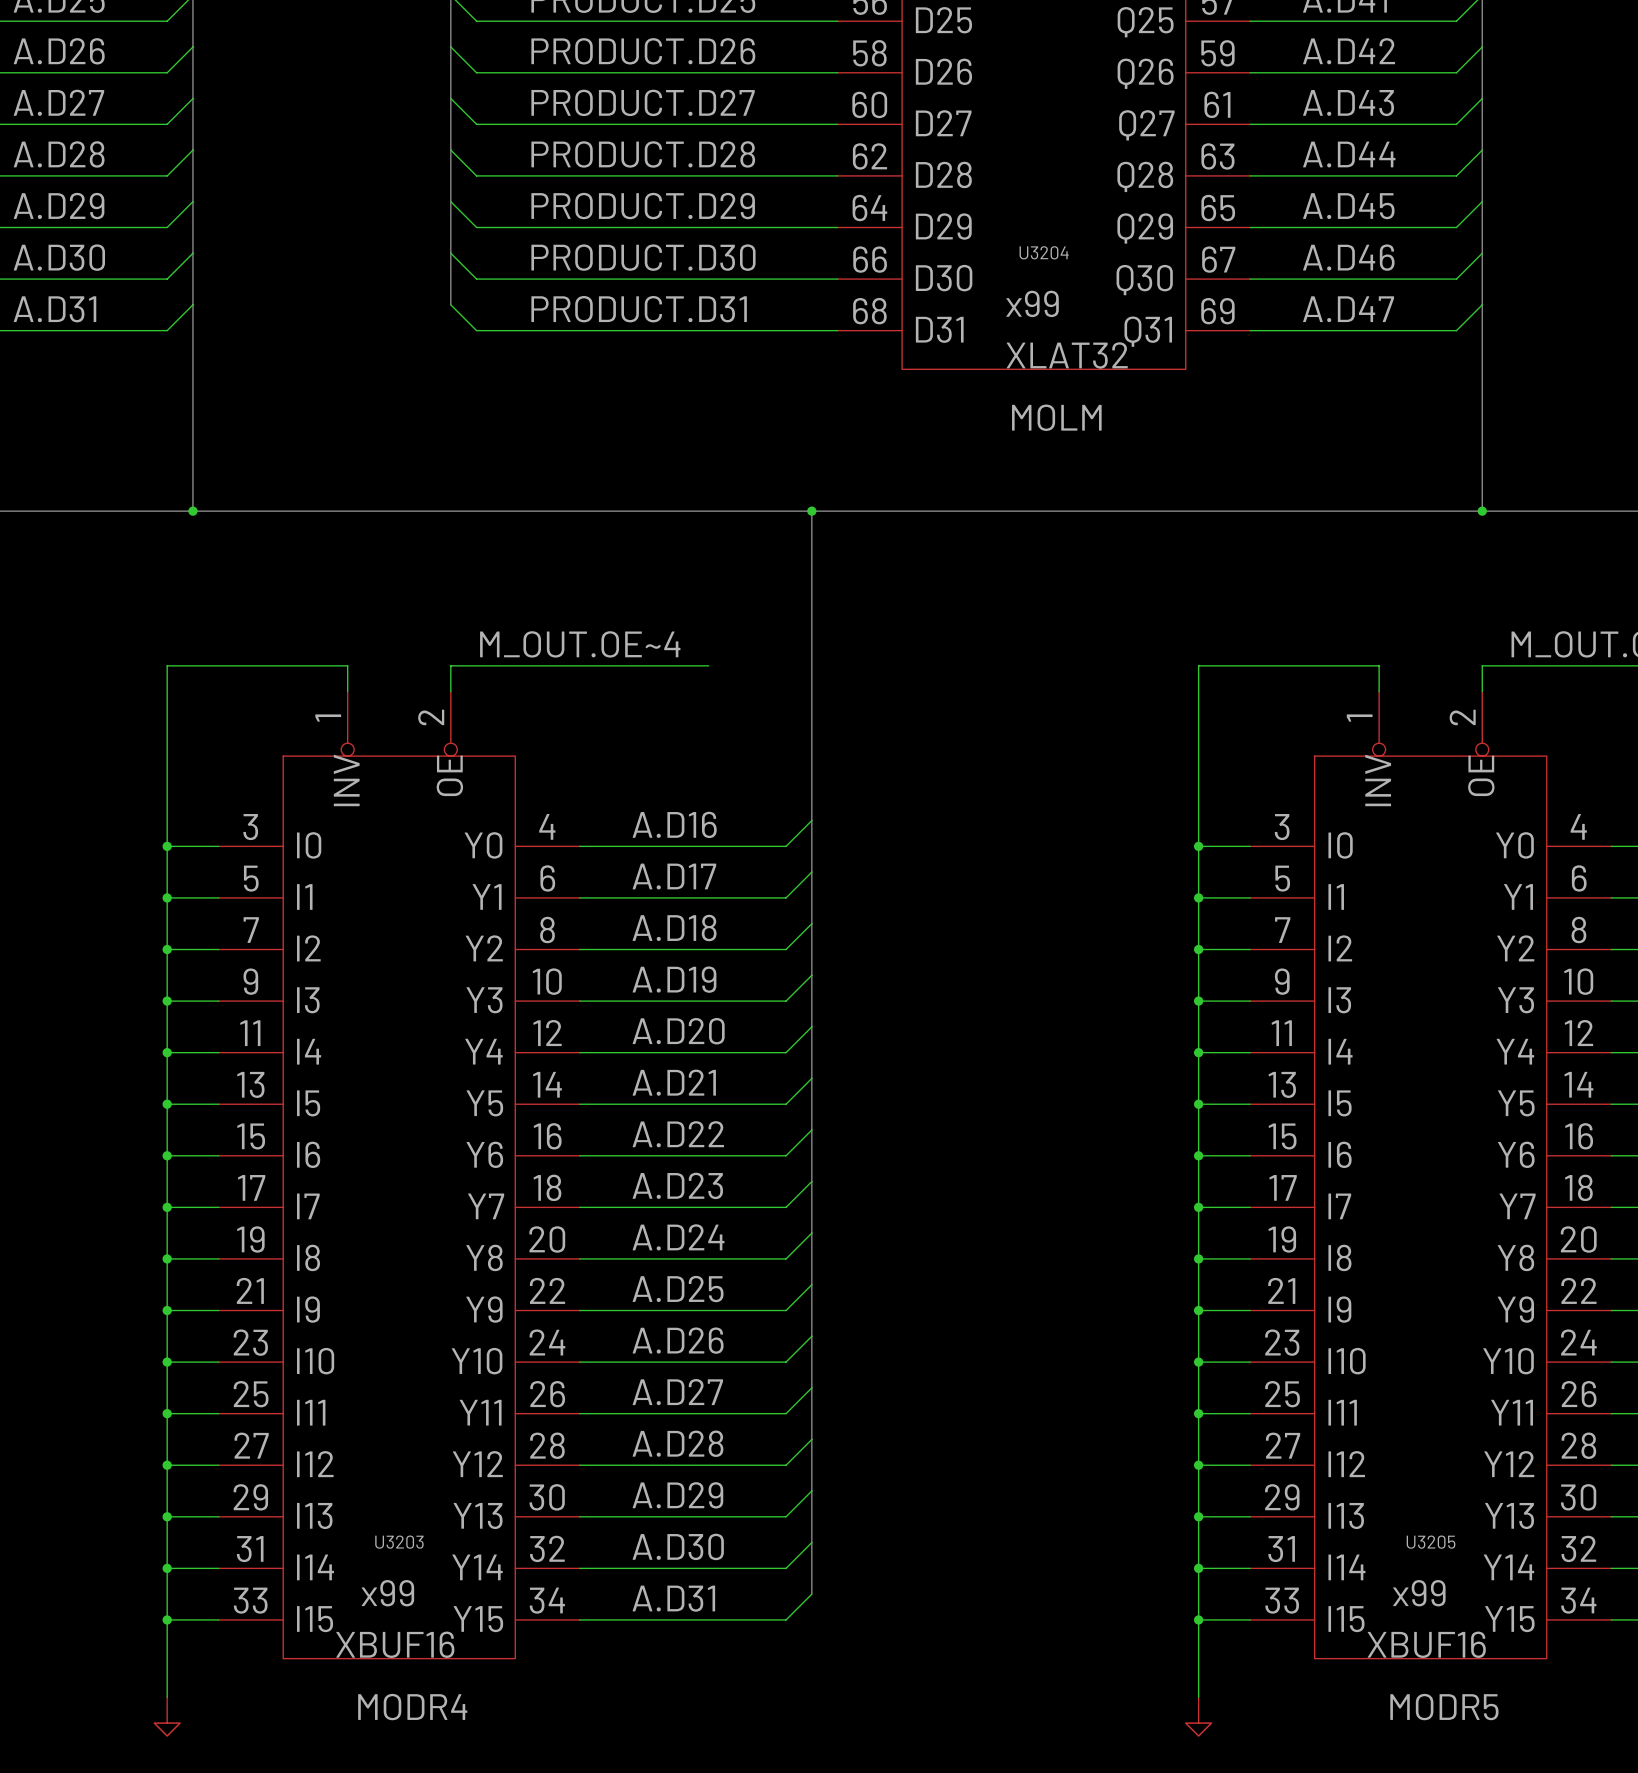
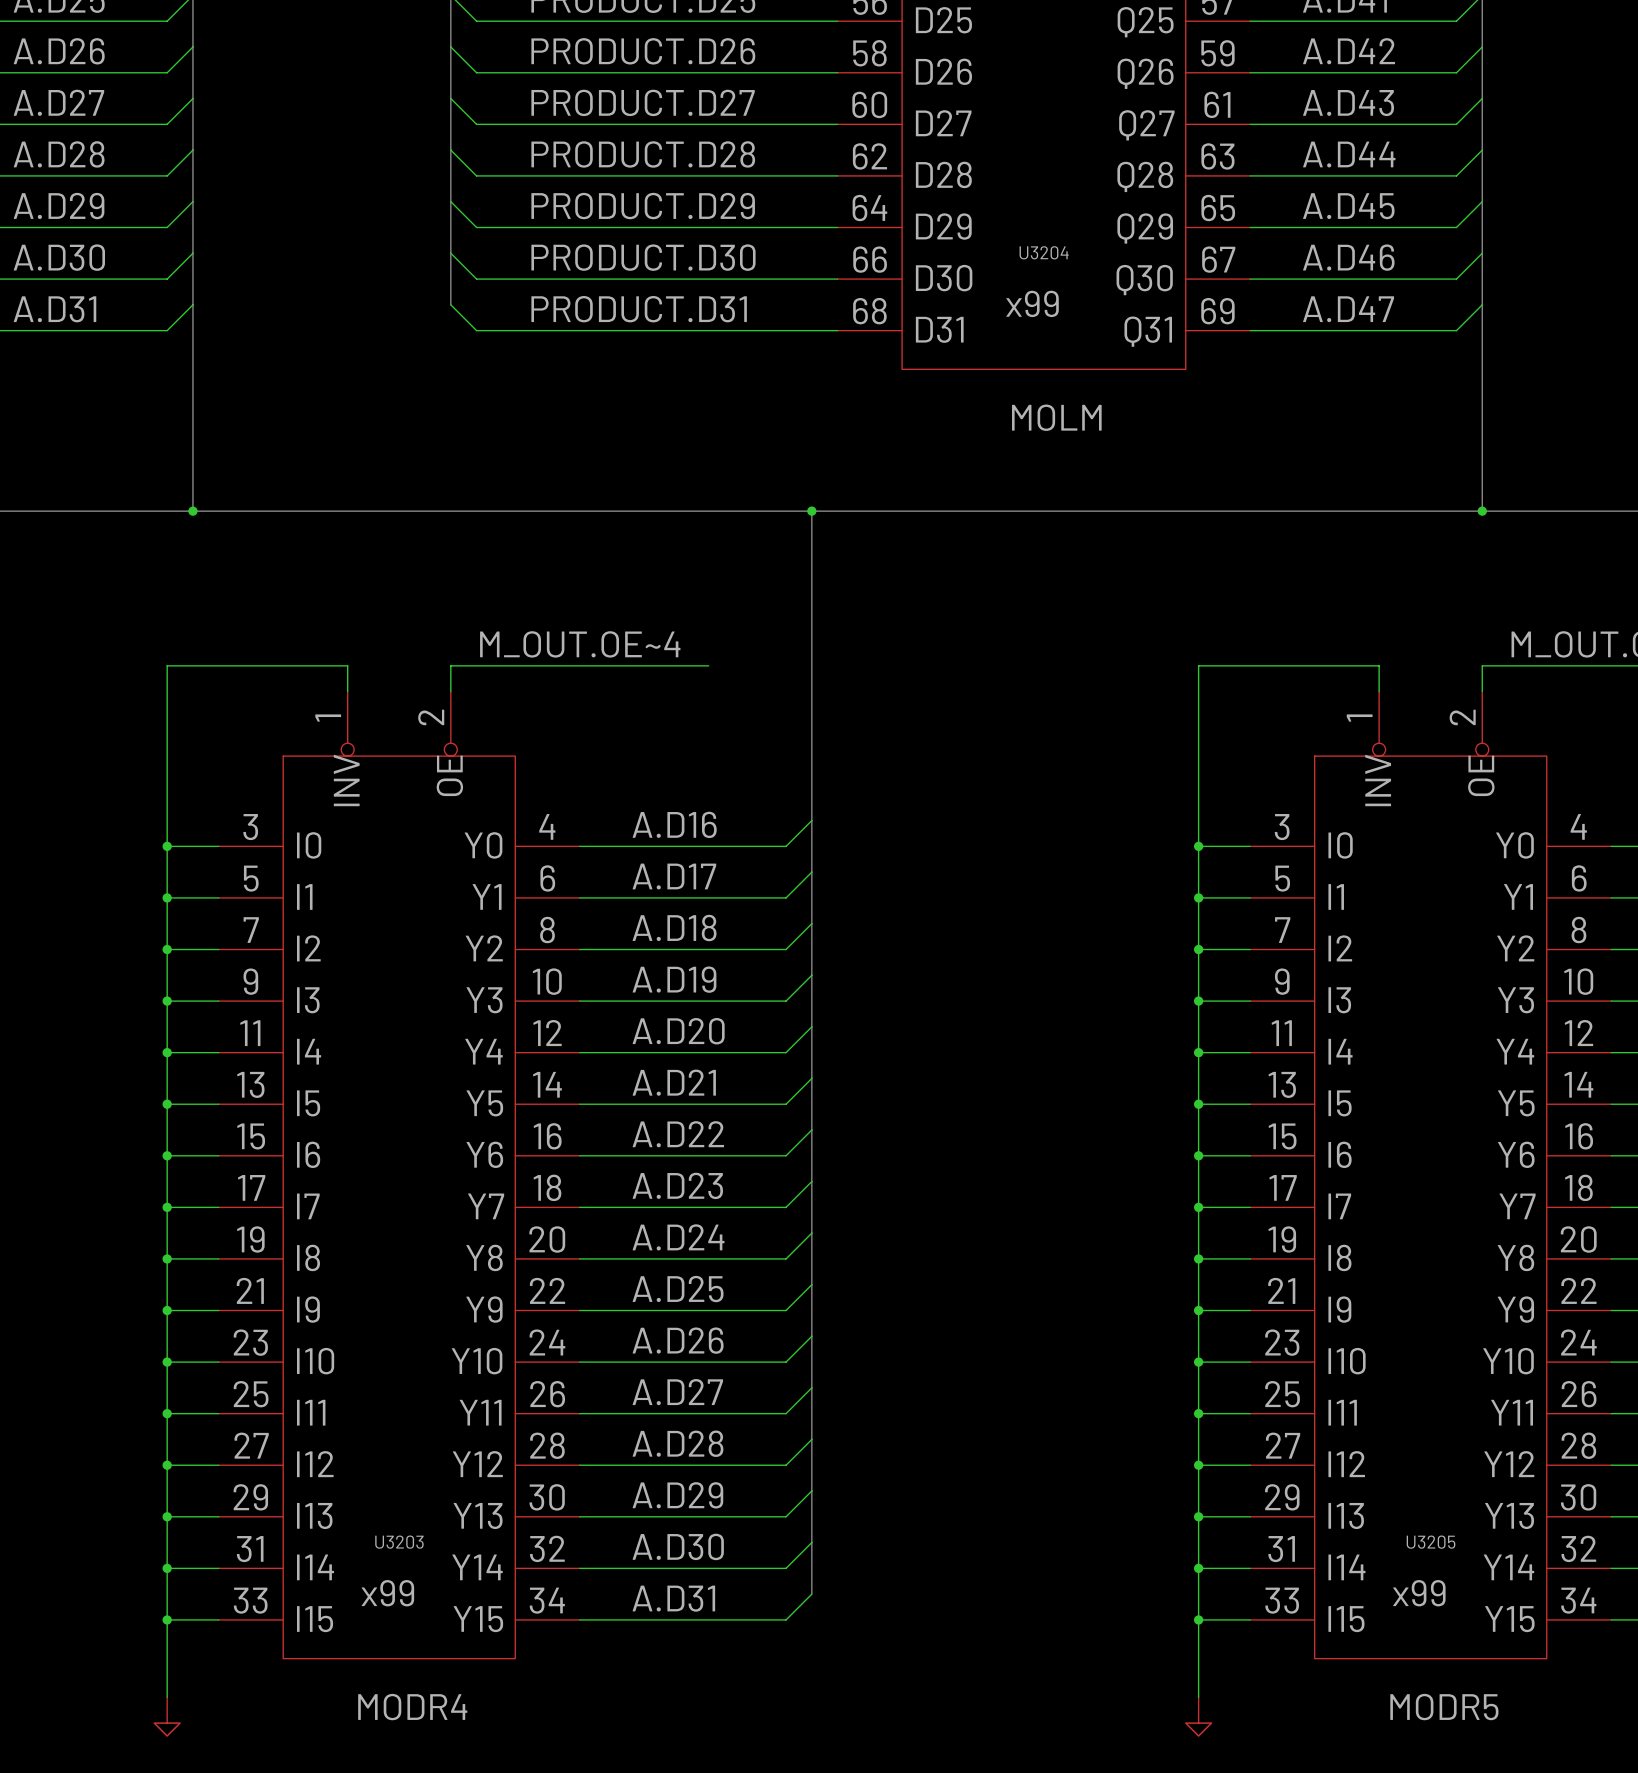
U3204 value: XLAT32 (1067, 355) -> none
U3203 value: XBUF16 (395, 1644) -> none
U3205 value: XBUF16 (1426, 1644) -> none

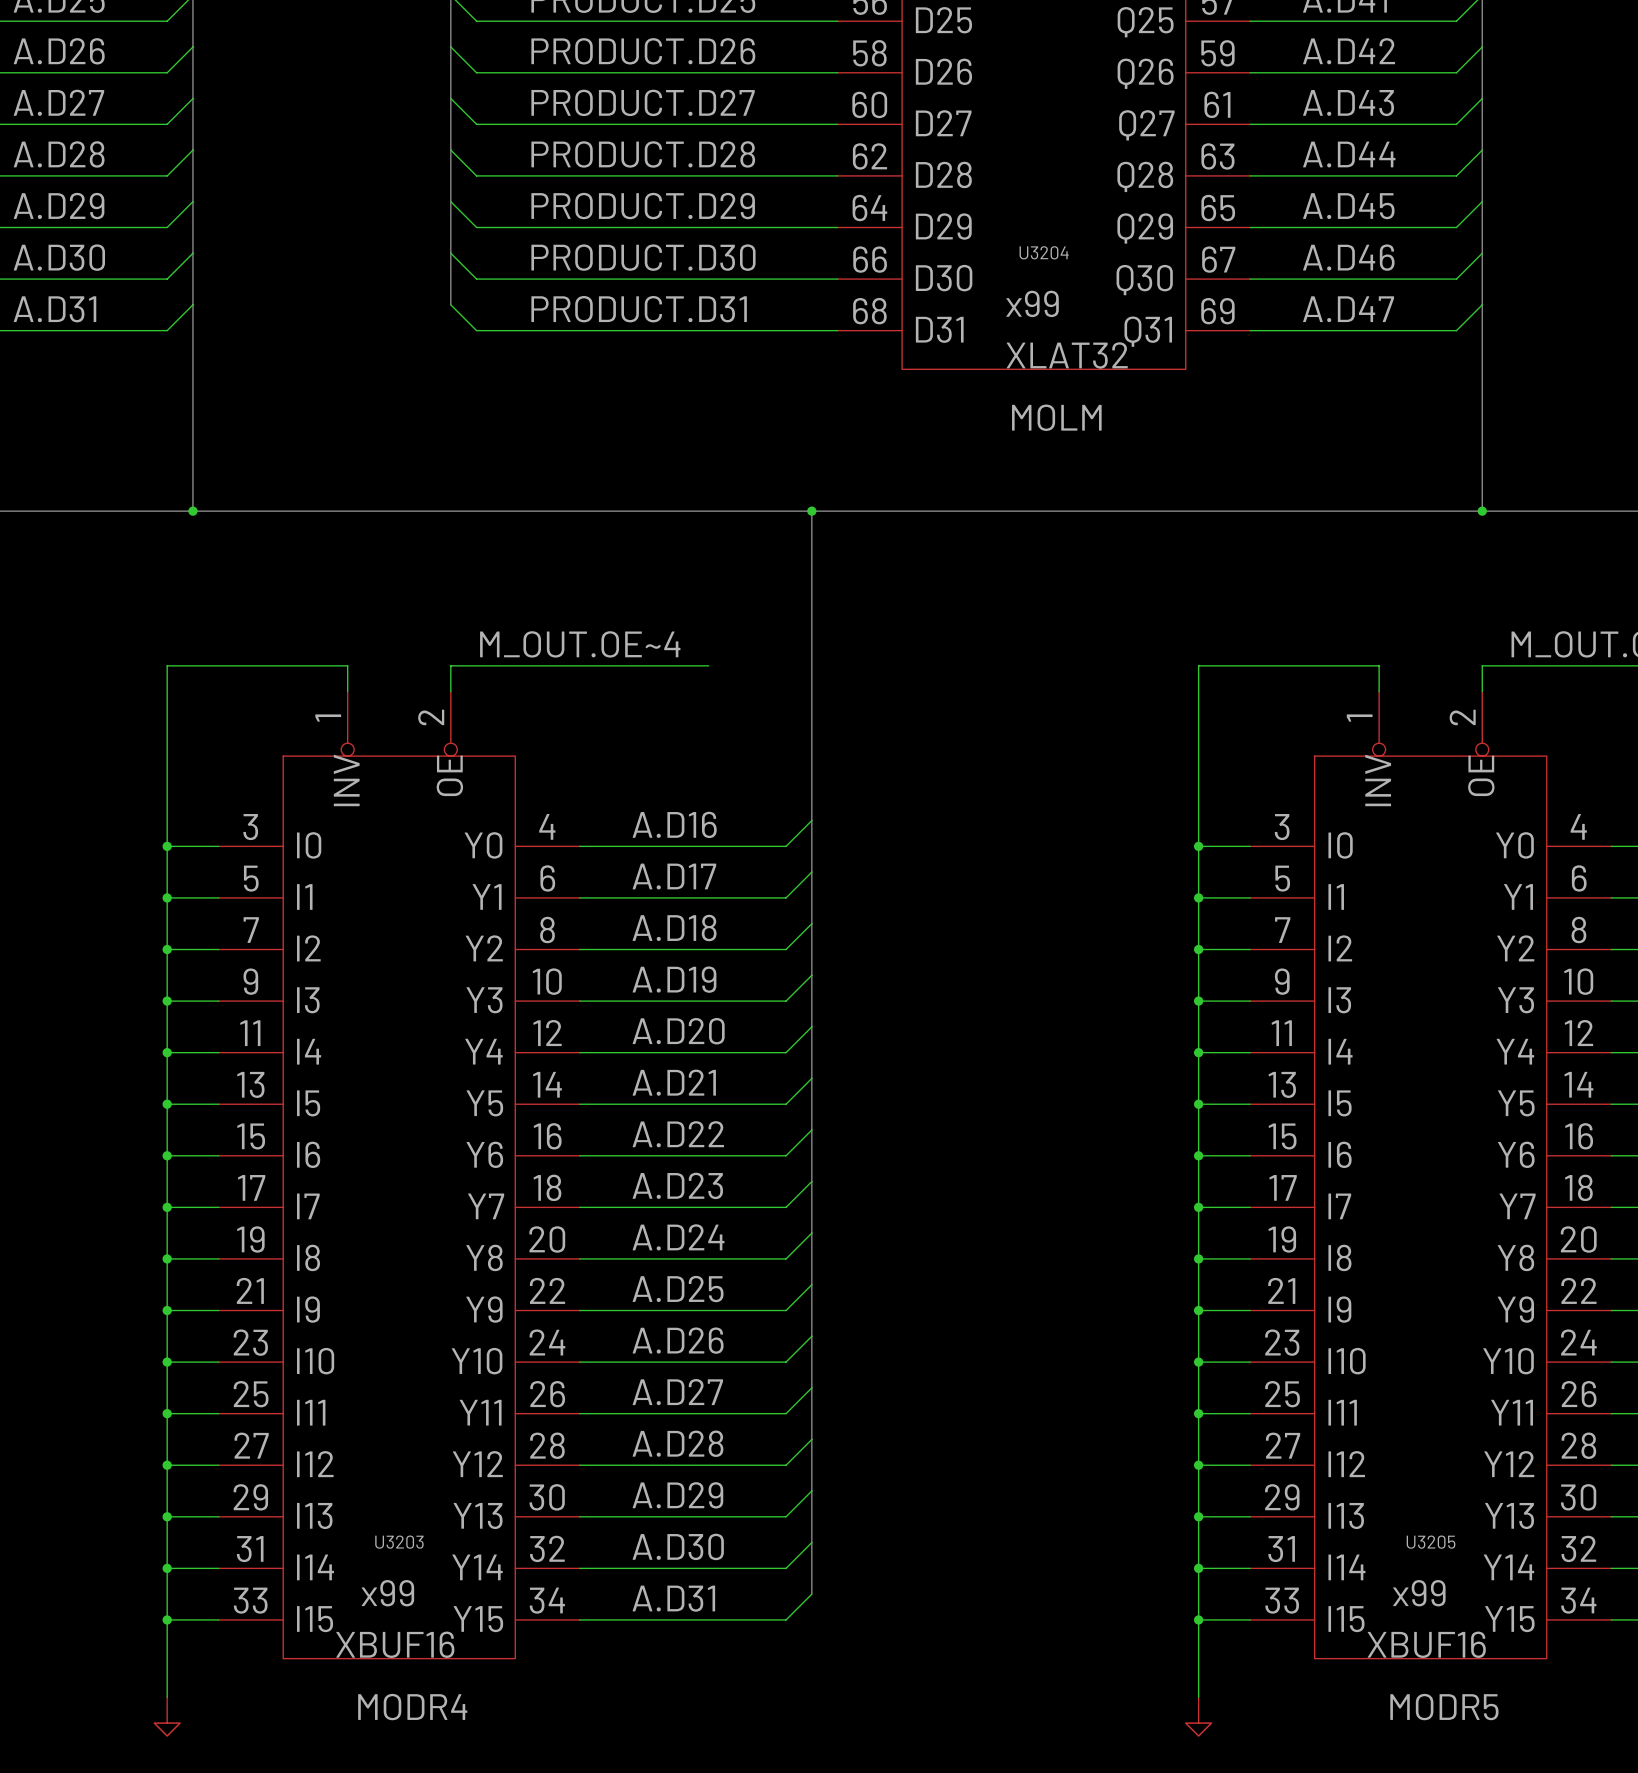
U3204 value: none -> XLAT32 (1067, 355)
U3203 value: none -> XBUF16 (395, 1644)
U3205 value: none -> XBUF16 (1426, 1644)

